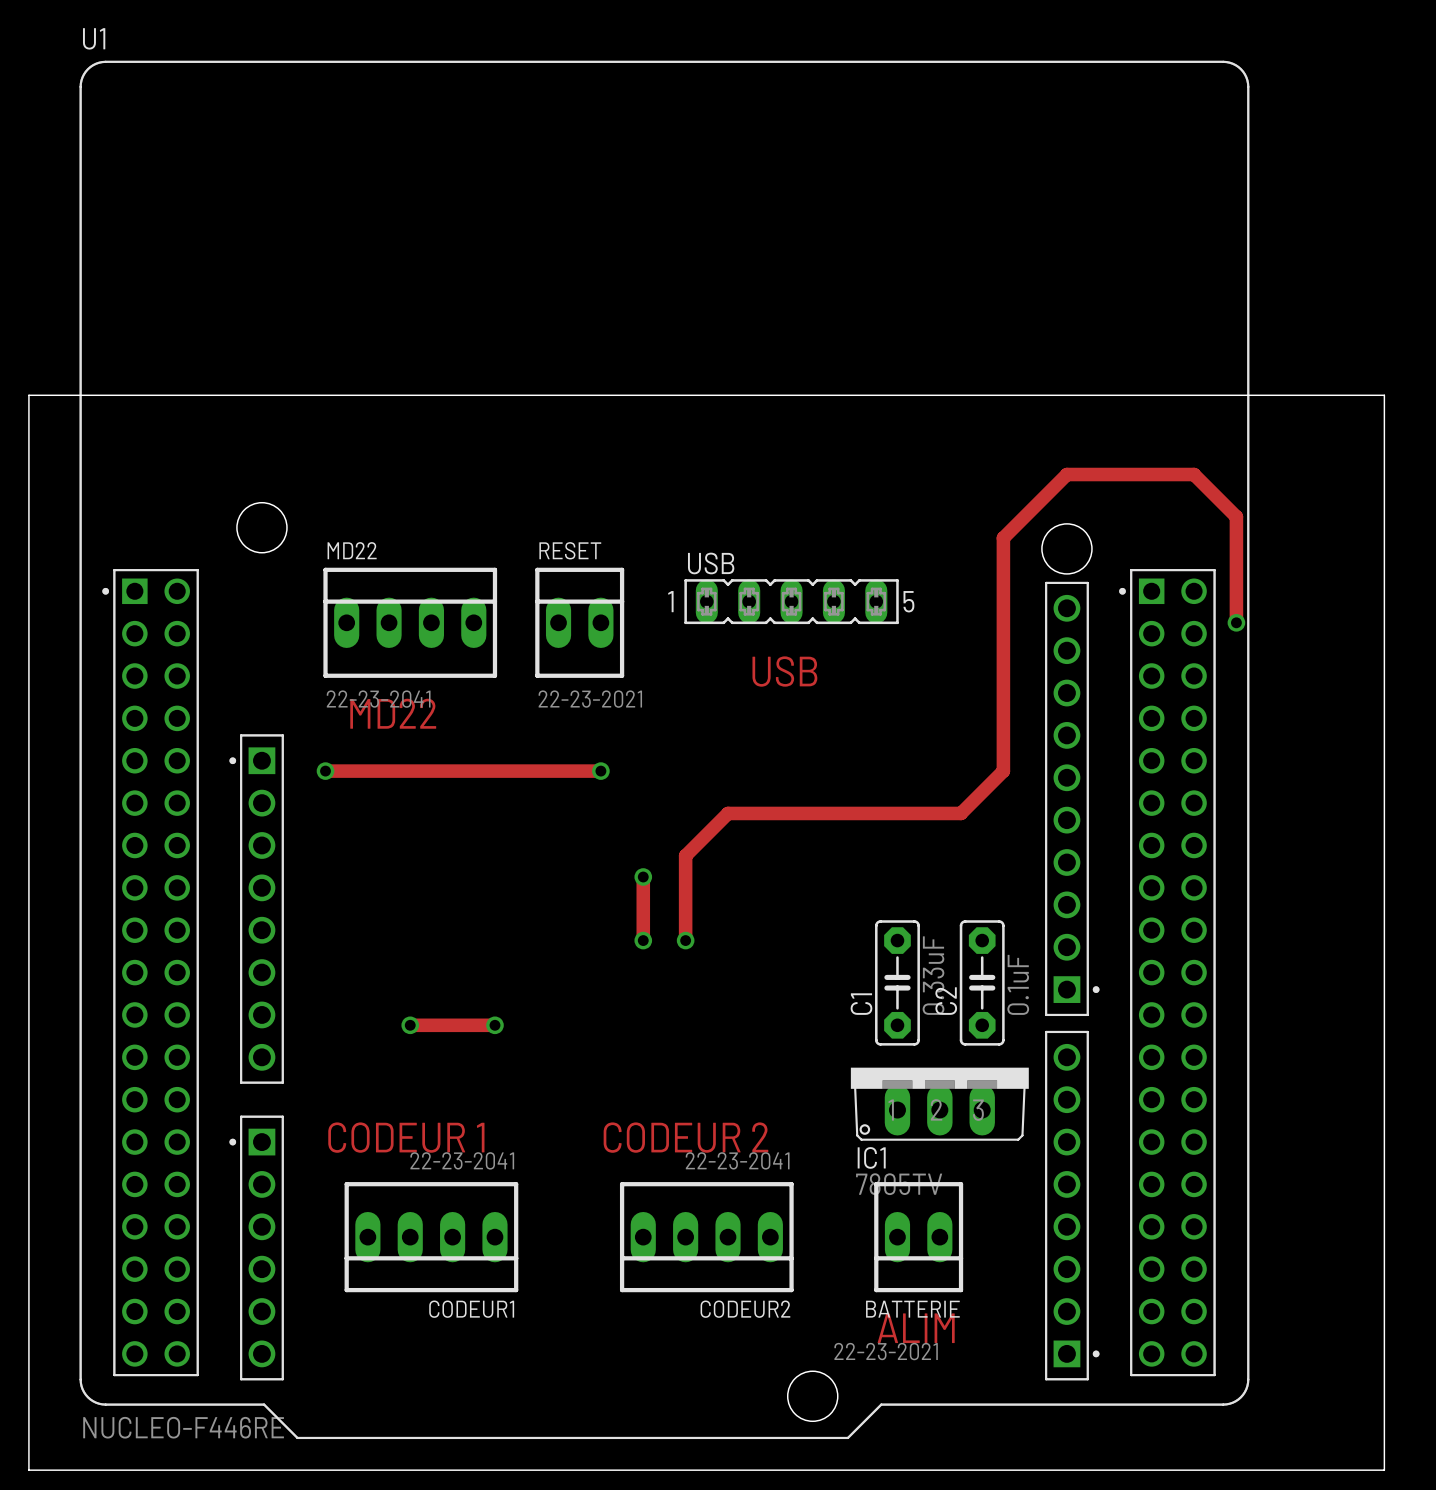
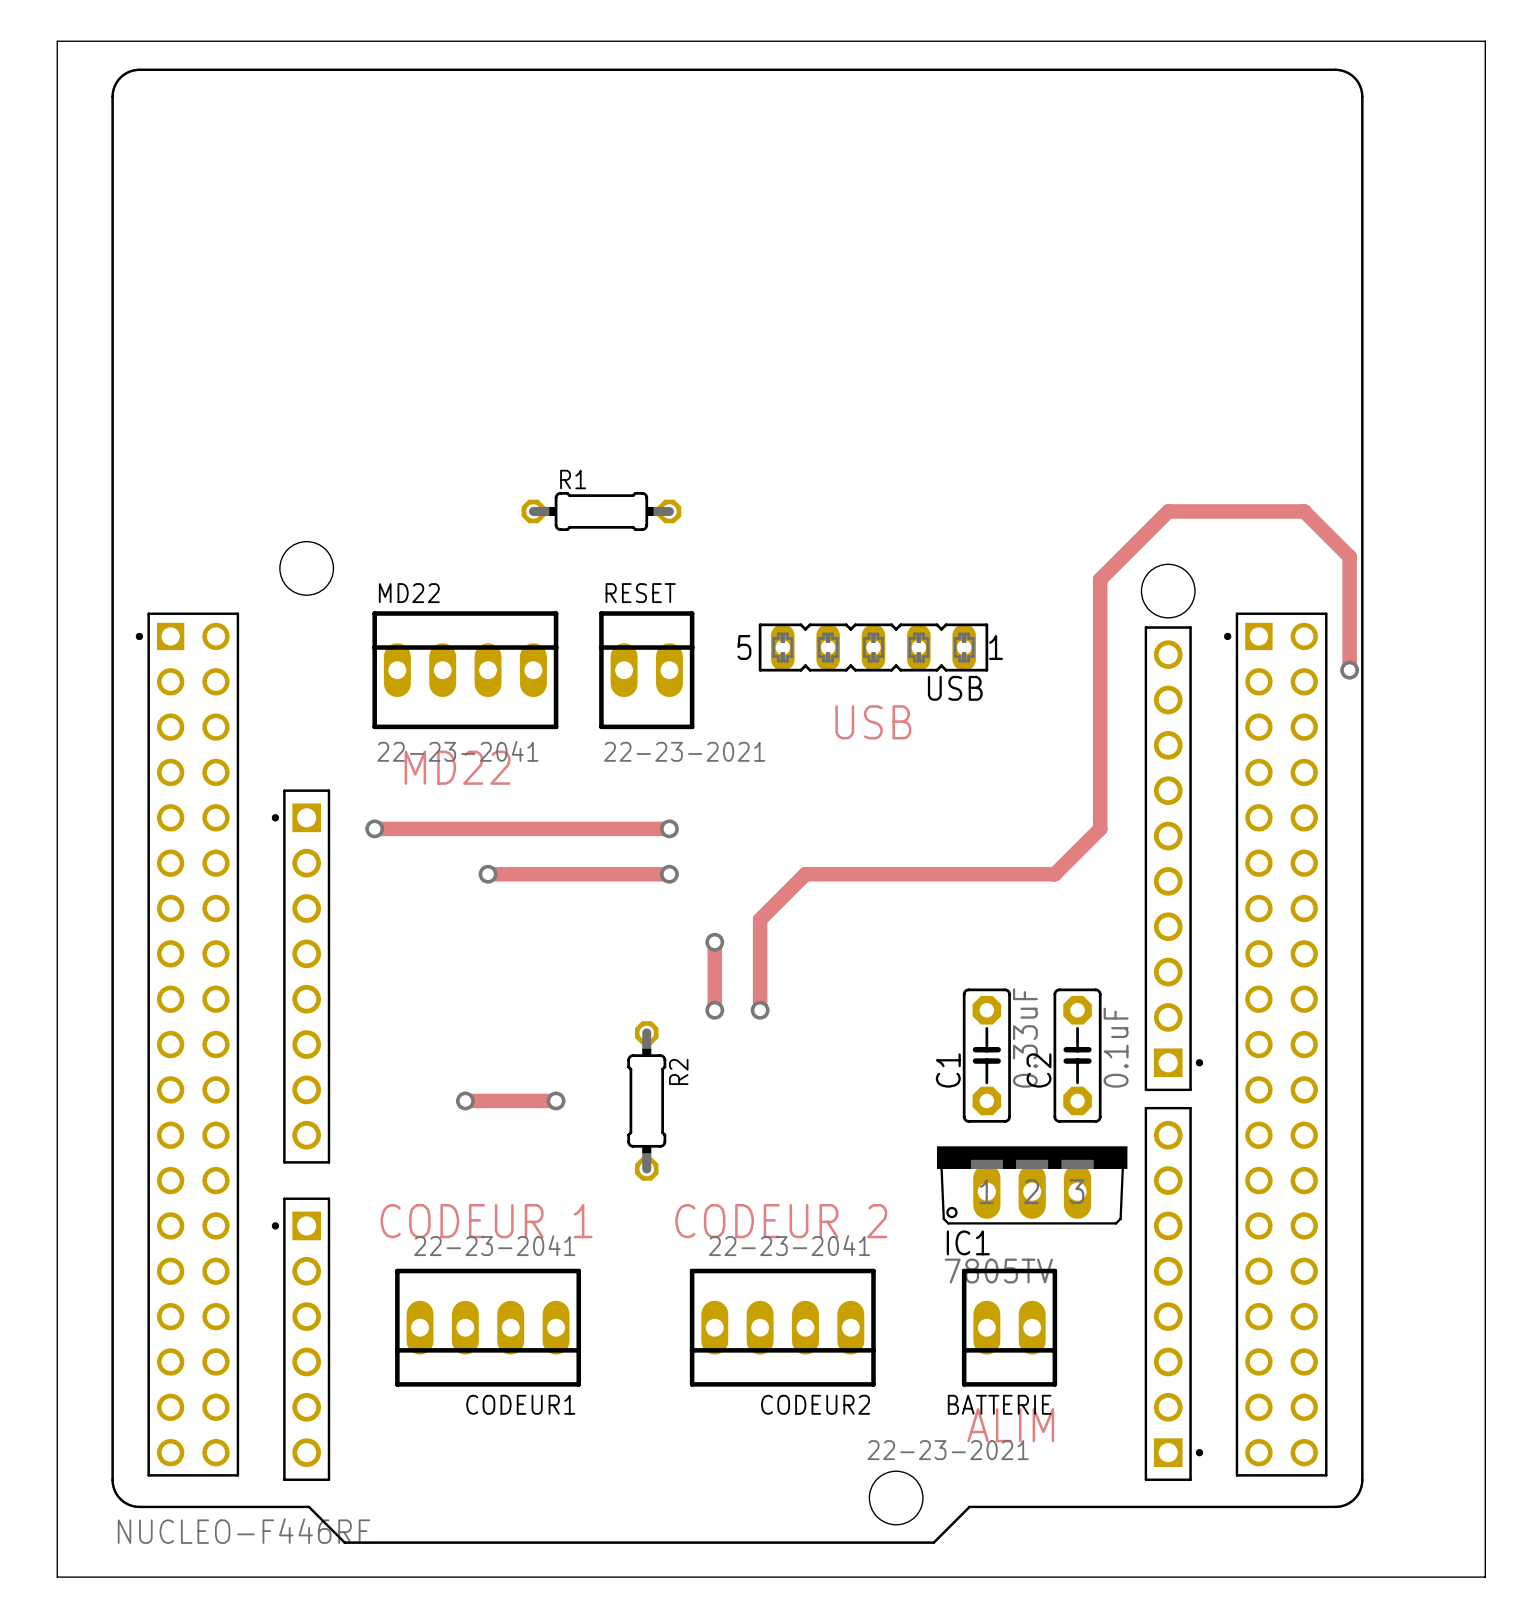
U1 name: U1 (94, 38) -> none
board edge: (28, 395) (1384, 395) (1384, 1470) (1363, 1470) -> (57, 426) (57, 41) (1485, 41) (1485, 1577)
R1: none -> (601, 511)
USB name position: USB (711, 563) -> USB (955, 688)
USB text position: 1 (670, 601) -> 1 (996, 647)
USB text position: 5 (908, 601) -> 5 (744, 647)
track: none -> (488, 874) (669, 874)
via: none -> (488, 874)
via: none -> (669, 874)
R2: none -> (646, 1100)

